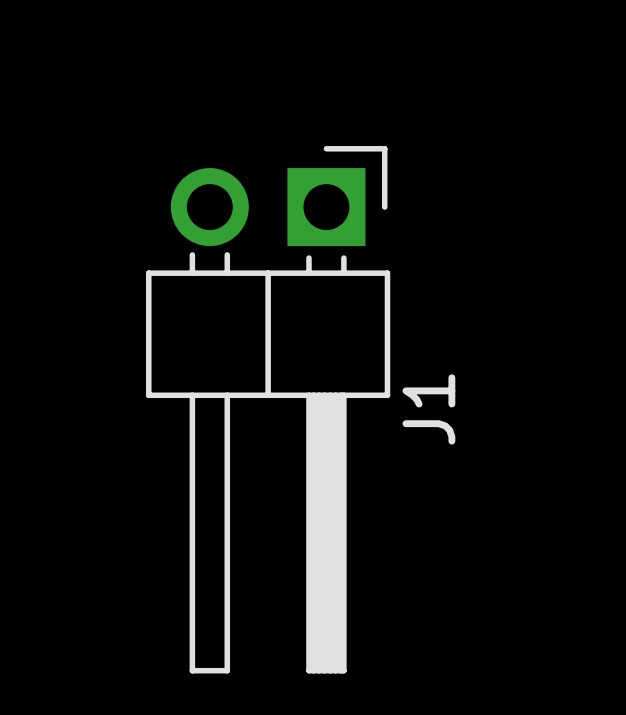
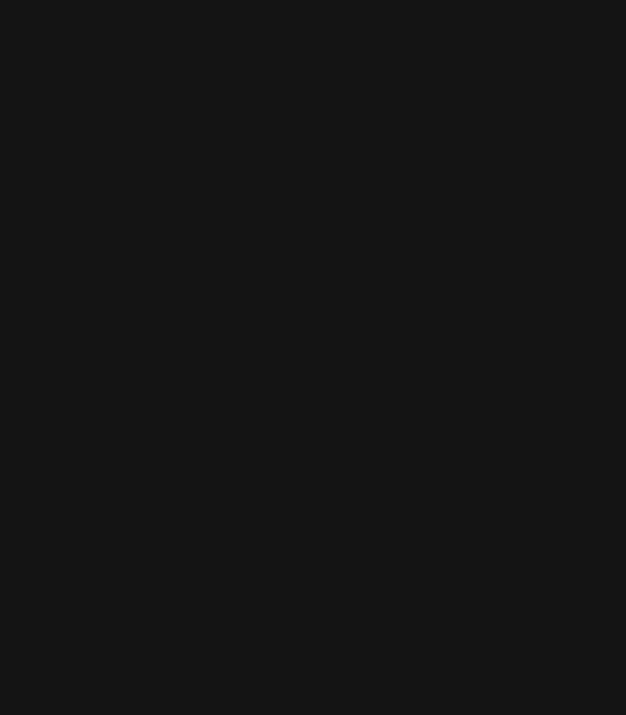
J1: (268, 409) -> none

